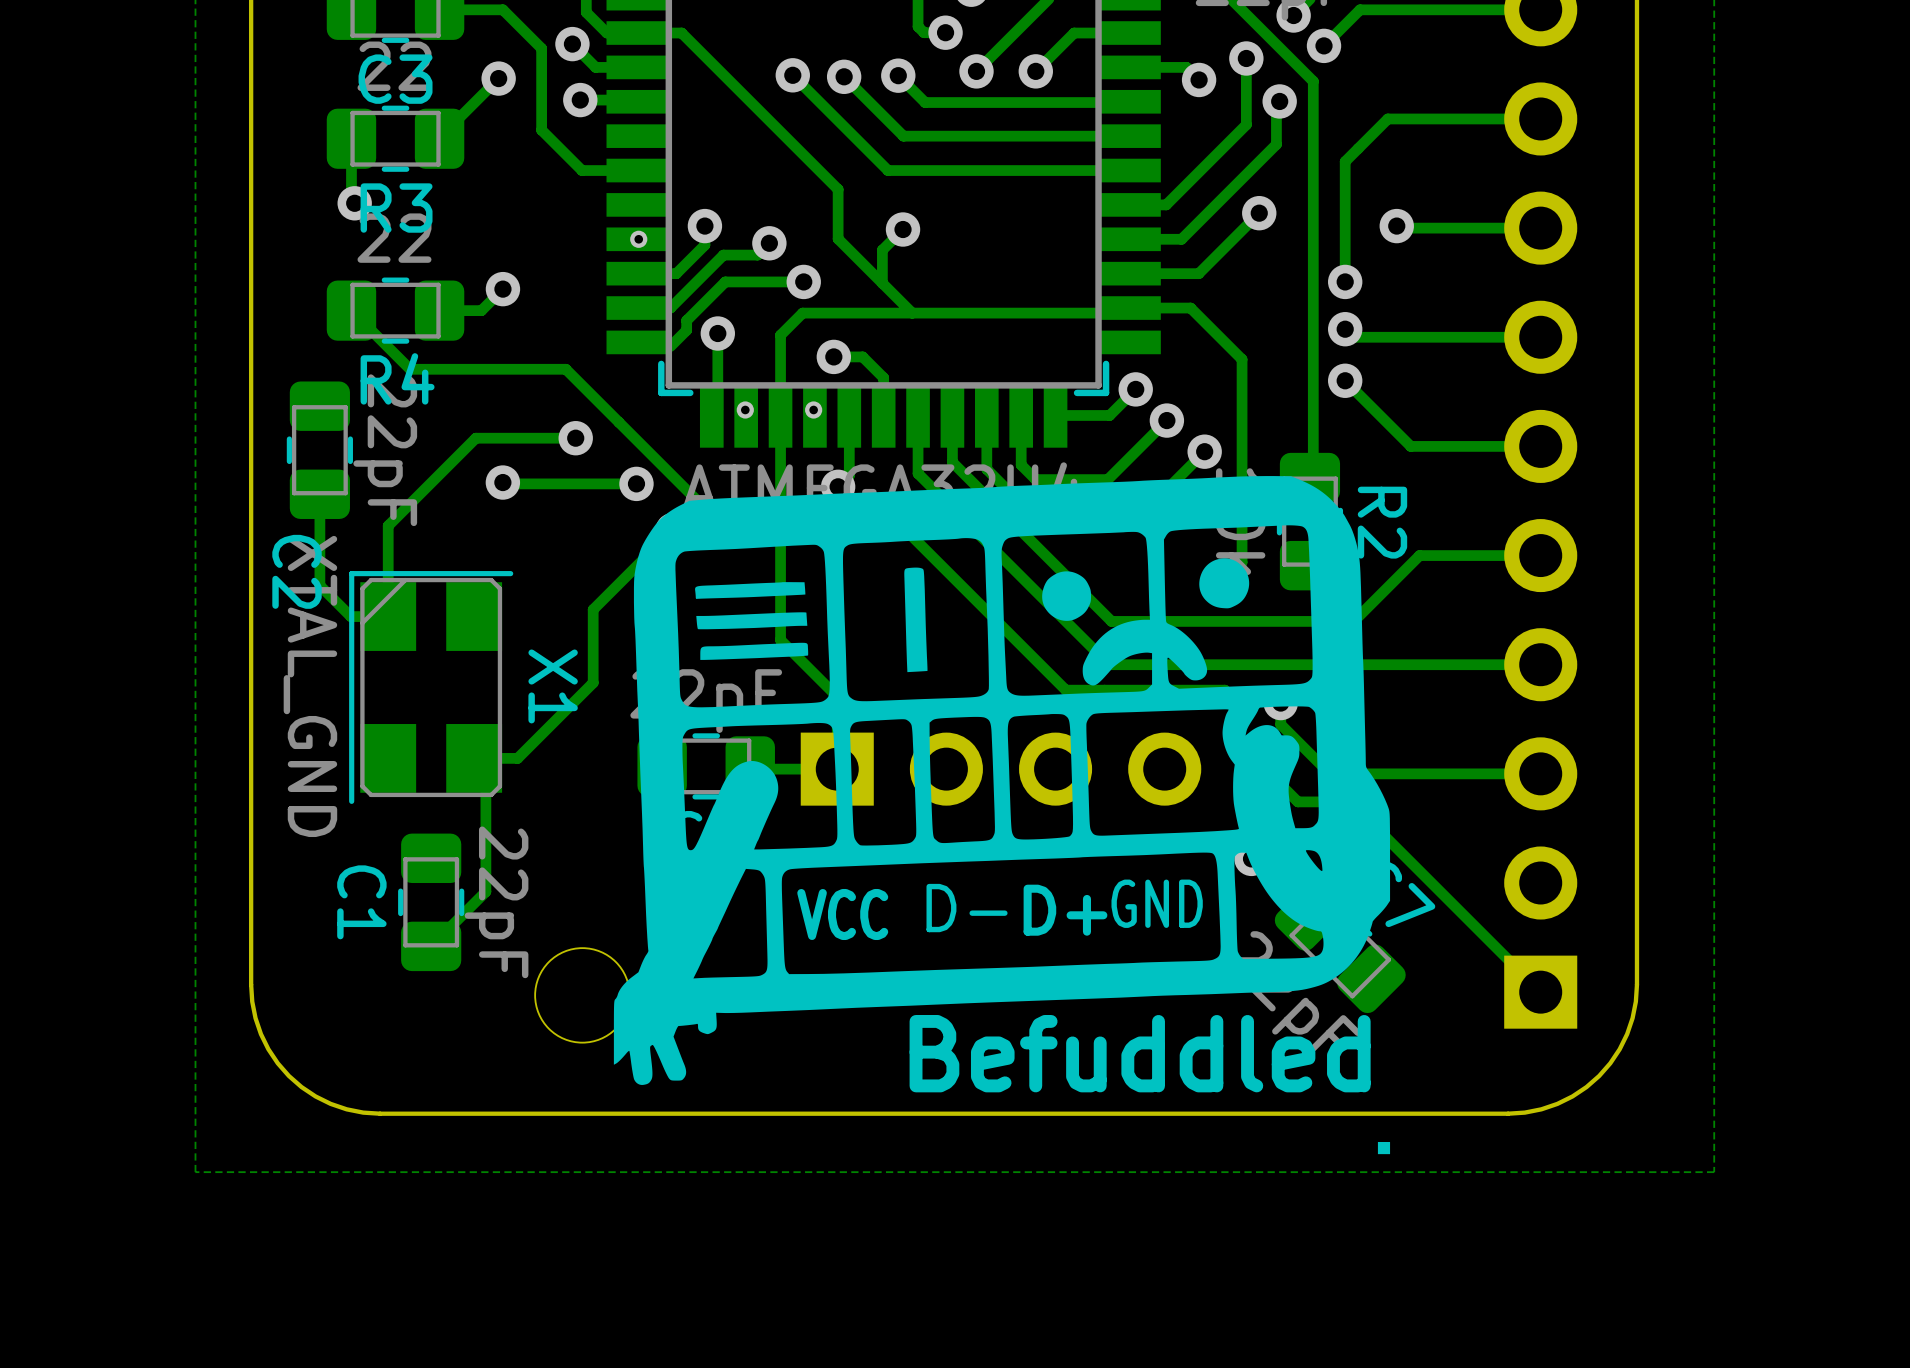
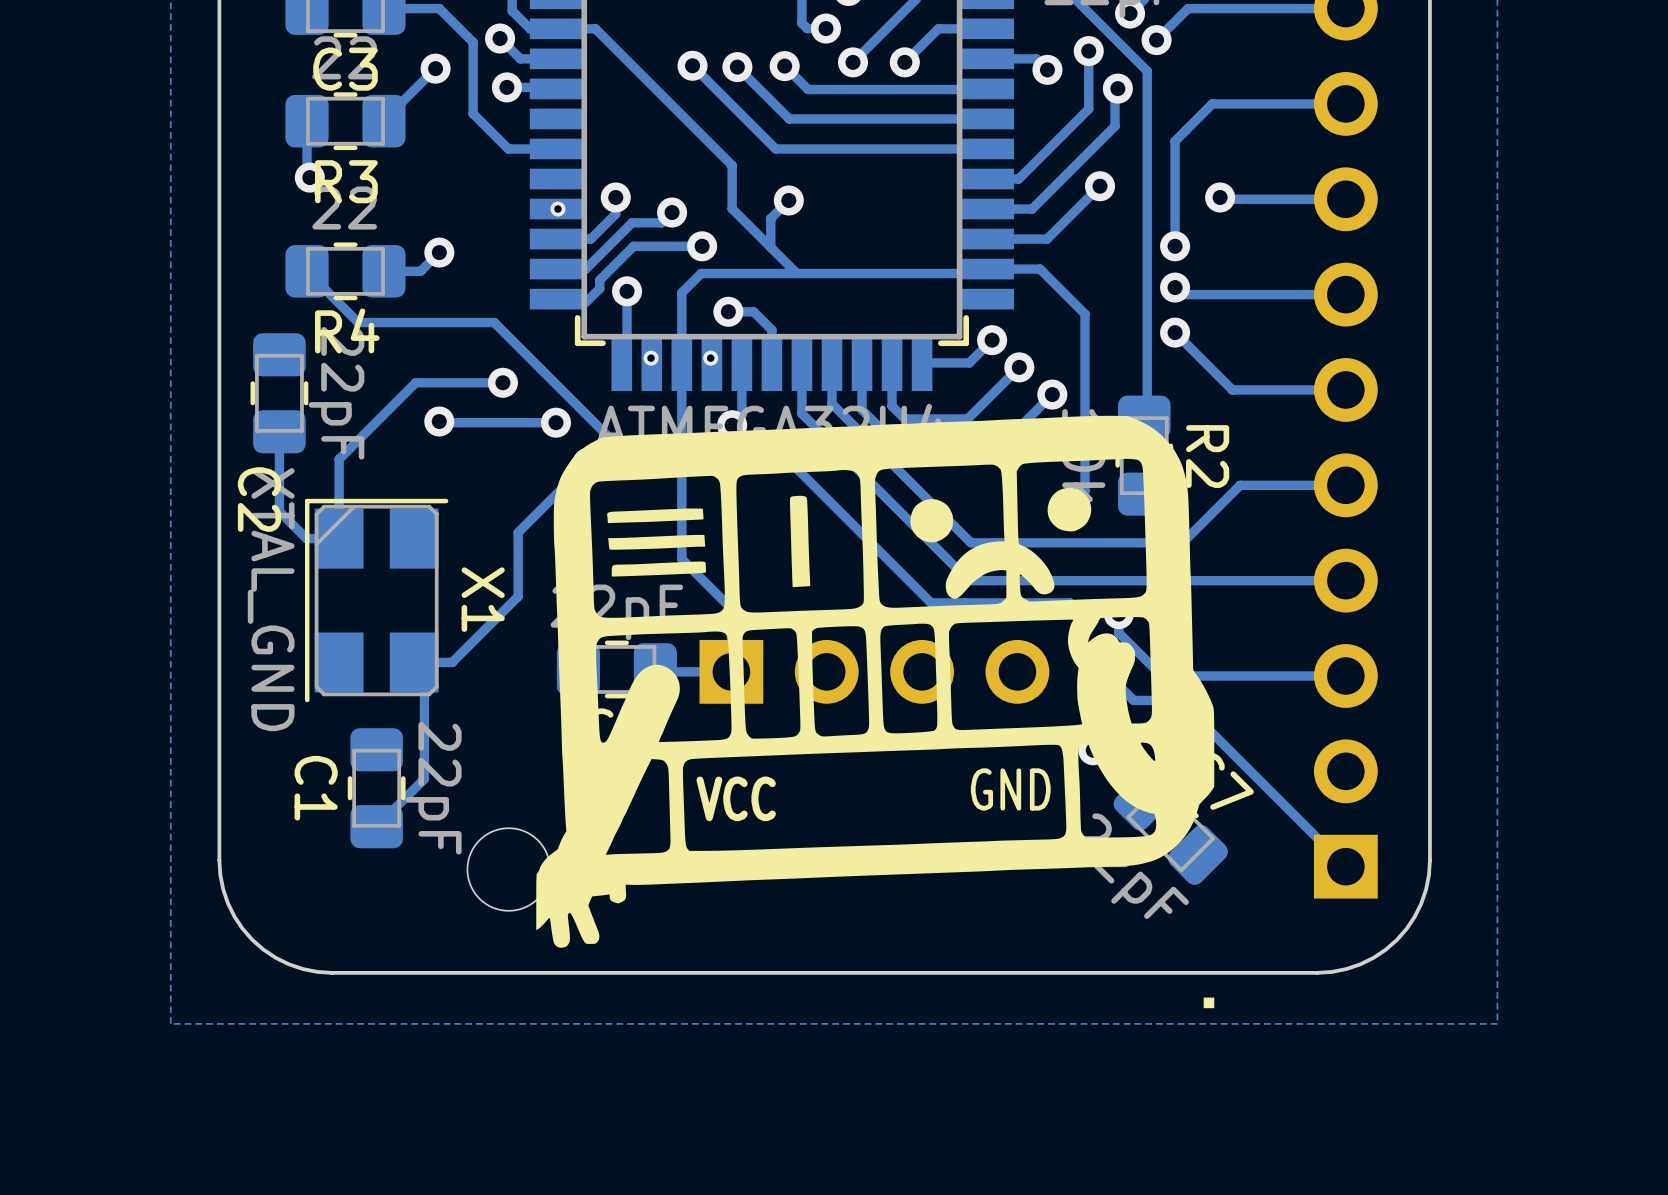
text: D- (967, 908) -> none
text: D+ (1065, 910) -> none
text: Befuddled (1140, 1053) -> none

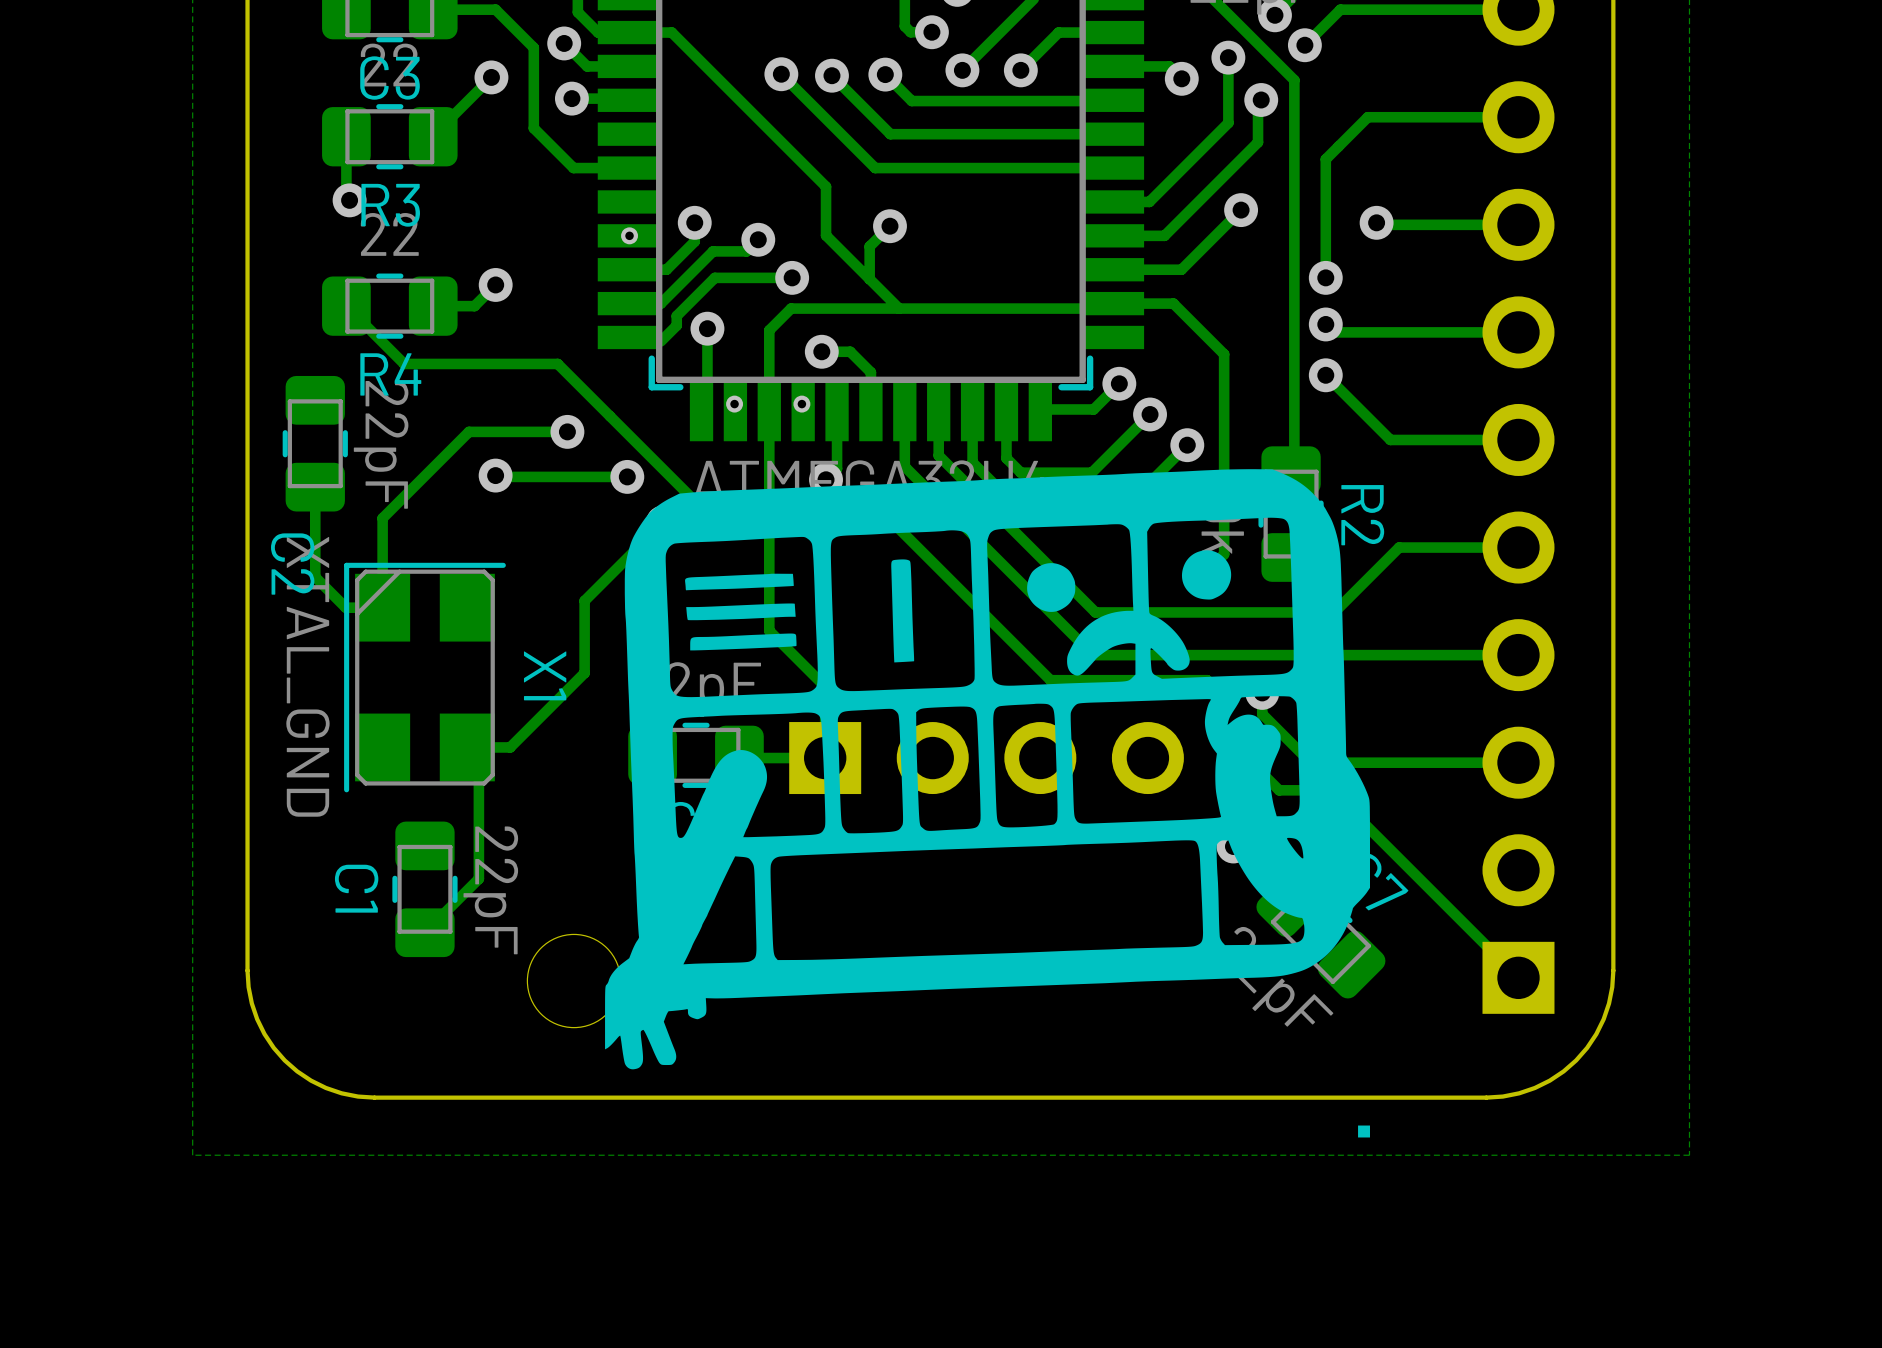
text: GND (1010, 789) -> none
text: VCC (736, 798) -> none

